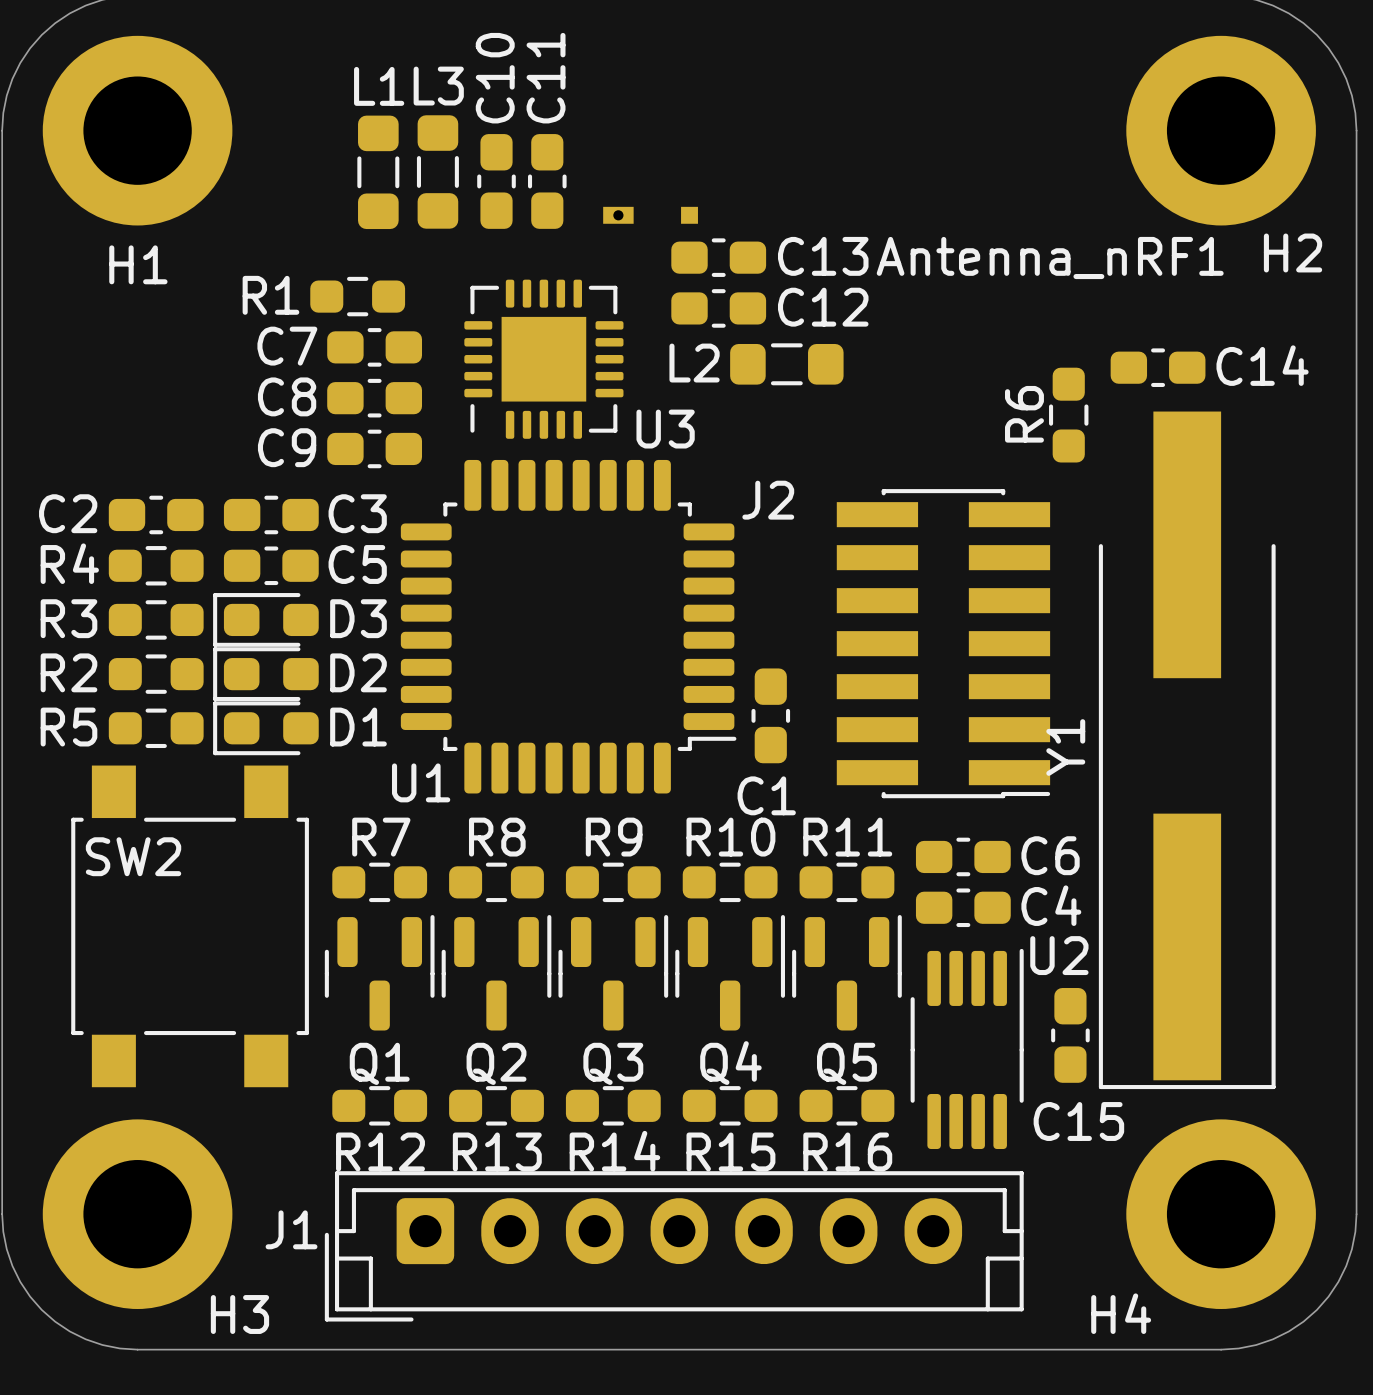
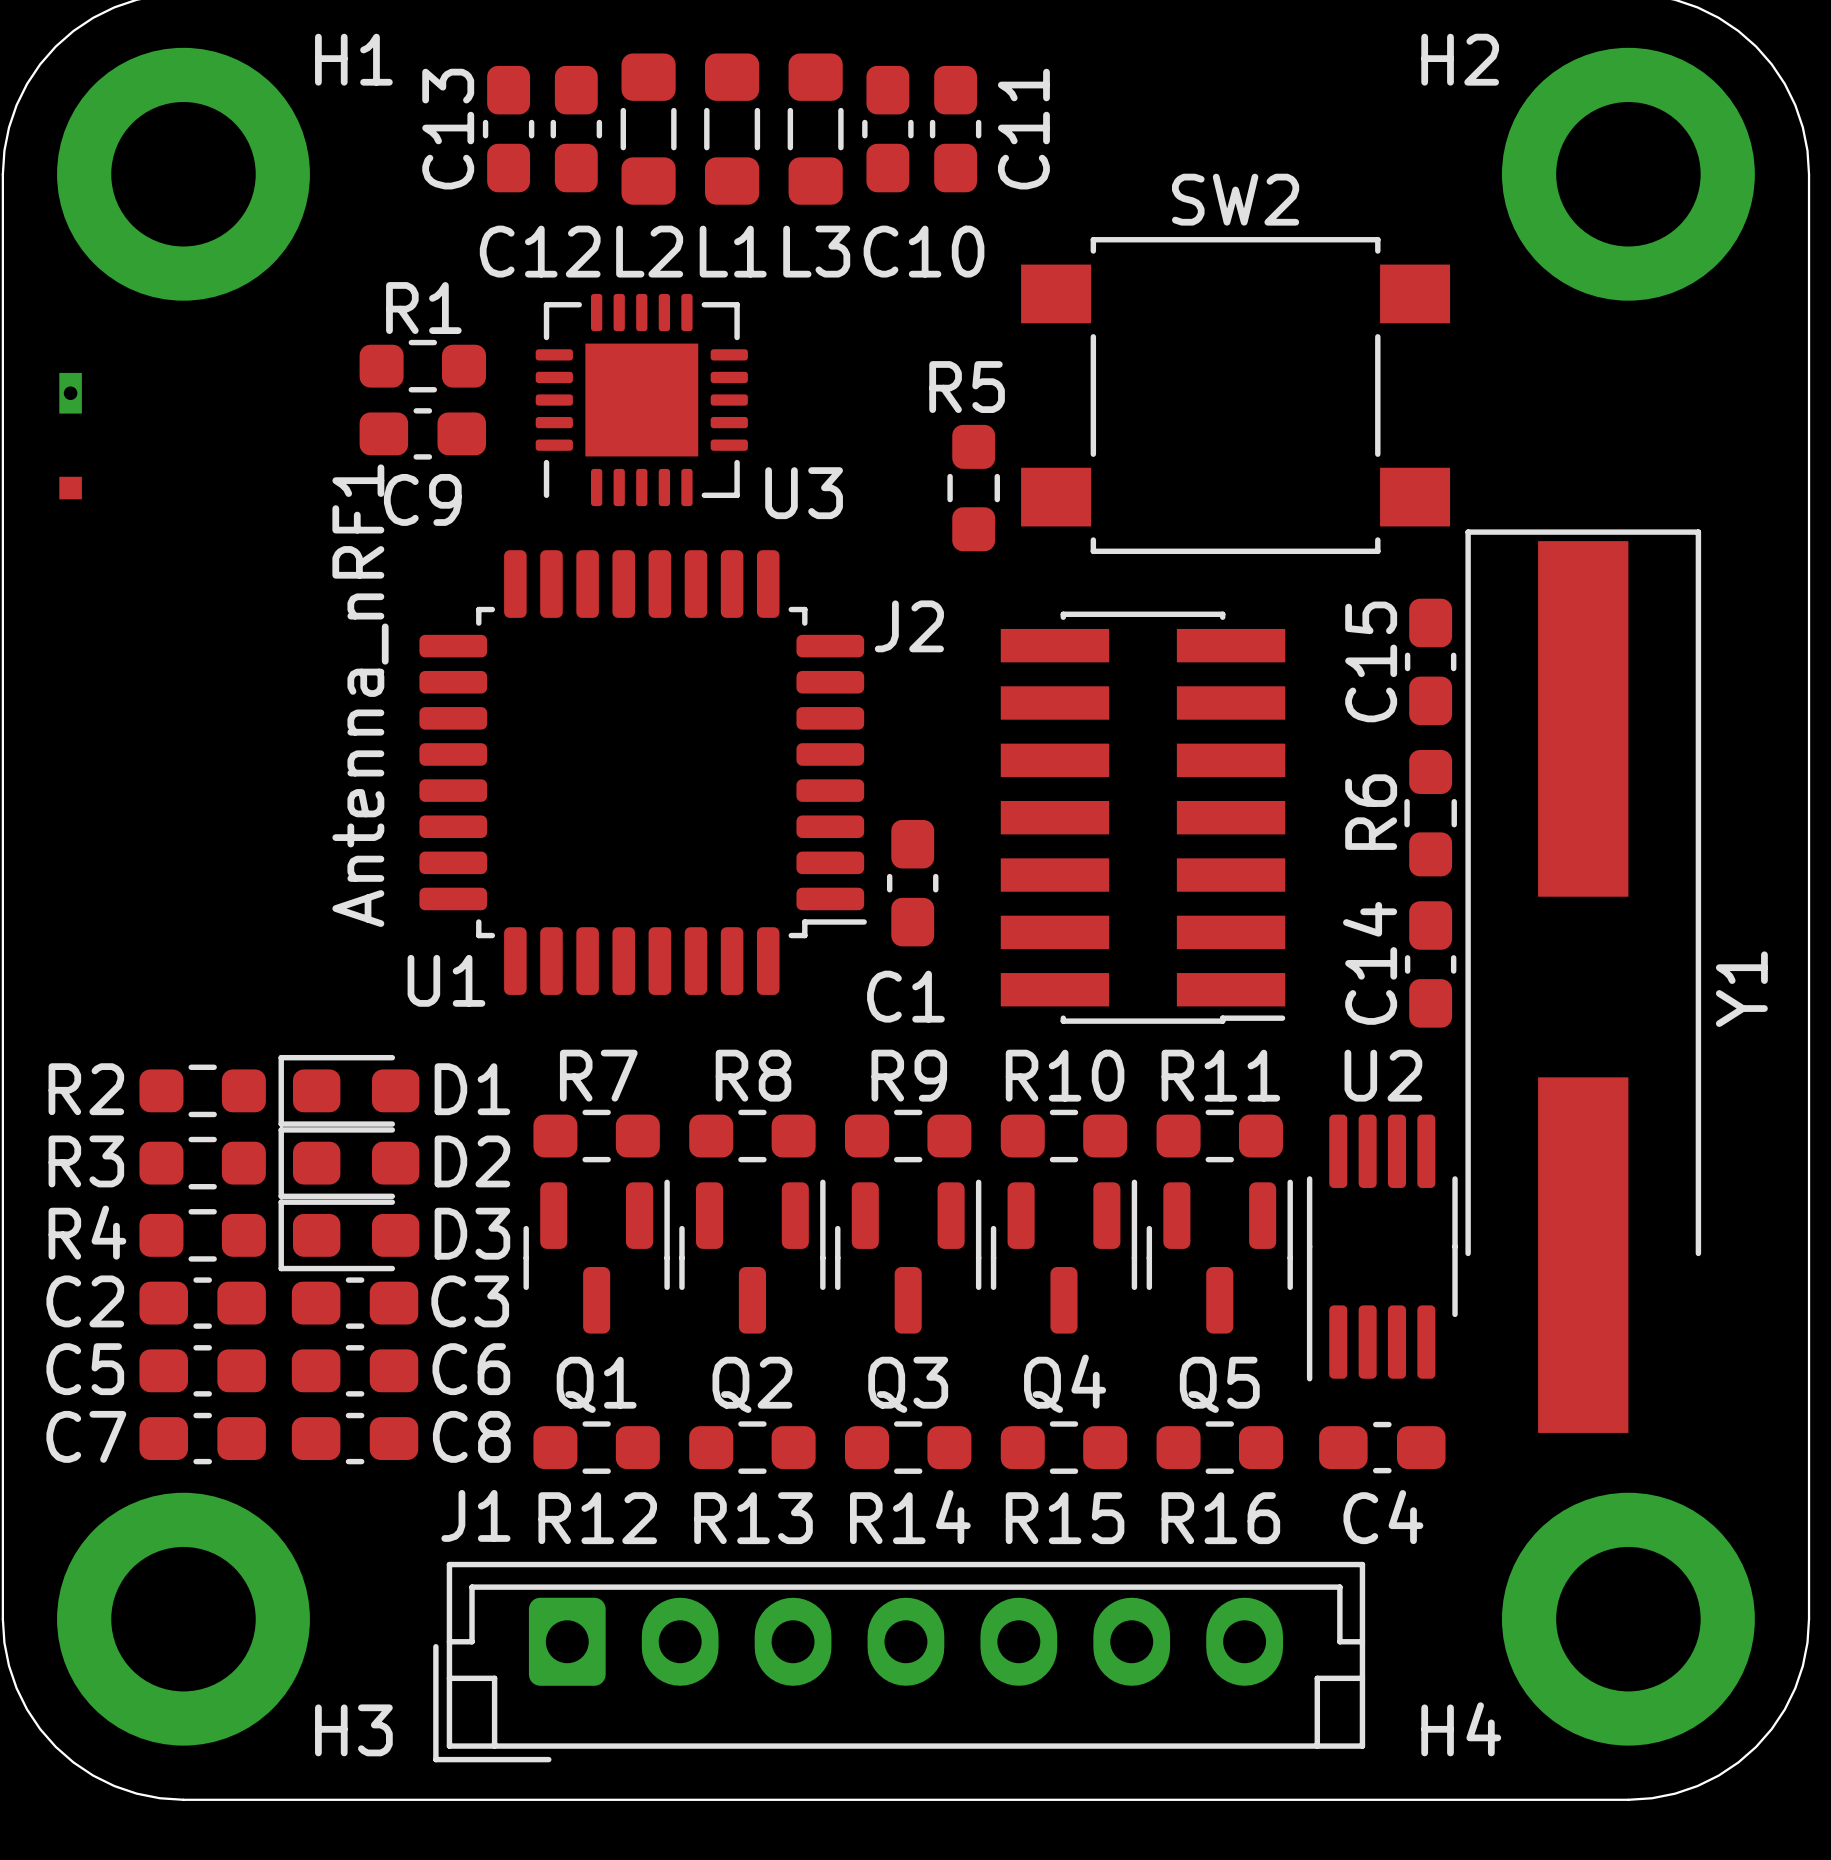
C10 name rotation: 0° (495, 78) -> 90° clockwise (924, 251)
C10 name position: C10 (495, 78) -> C10 (924, 251)
C11 name position: C11 (546, 78) -> C11 (1023, 129)
L1 name position: L1 (379, 86) -> L1 (733, 251)
L3 name position: L3 (438, 86) -> L3 (816, 251)
L3 position: (437, 171) -> (815, 129)
L1 position: (378, 172) -> (732, 129)
C10 position: (496, 181) -> (887, 129)
C11 position: (547, 181) -> (955, 129)
Antenna_nRF1 rotation: 0° (650, 215) -> 90° clockwise (70, 436)
Antenna_nRF1 position: (650, 215) -> (70, 436)
H2 name position: H2 (1293, 252) -> H2 (1460, 59)
C13 name position: C13 (823, 256) -> C13 (448, 129)
C13 rotation: 0° (718, 257) -> 90° clockwise (508, 129)
C13 position: (718, 257) -> (508, 129)
Antenna_nRF1 name position: Antenna_nRF1 (1050, 257) -> Antenna_nRF1 (360, 695)
H1 name position: H1 (138, 264) -> H1 (353, 59)
R1 name position: R1 (270, 295) -> R1 (423, 308)
R1 position: (357, 296) -> (422, 366)
C12 rotation: 0° (718, 308) -> 90° clockwise (576, 129)
C12 position: (718, 308) -> (576, 129)
C7 position: (374, 347) -> (202, 1438)
U3 position: (543, 359) -> (641, 400)
L2 name position: L2 (694, 363) -> L2 (649, 251)
L2 rotation: 0° (786, 364) -> 90° clockwise (648, 129)
L2 position: (786, 364) -> (648, 129)
C14 name position: C14 (1262, 365) -> C14 (1370, 963)
C14 rotation: 0° (1158, 367) -> 90° clockwise (1430, 964)
C14 position: (1158, 367) -> (1430, 964)
C8 name position: C8 (287, 396) -> C8 (471, 1436)
C8 position: (374, 398) -> (355, 1438)
R6 position: (1068, 415) -> (1430, 813)
C9 name position: C9 (287, 447) -> C9 (422, 499)
C9 position: (374, 448) -> (422, 433)
C2 position: (156, 514) -> (202, 1303)
C3 position: (271, 514) -> (355, 1303)
C5 name position: C5 (357, 564) -> C5 (85, 1369)
R4 position: (156, 565) -> (202, 1235)
C5 position: (271, 565) -> (202, 1370)
R3 position: (156, 619) -> (202, 1163)
D3 position: (265, 619) -> (348, 1235)
U1 position: (568, 626) -> (643, 772)
J2 position: (943, 643) -> (1143, 817)
R2 position: (156, 674) -> (202, 1090)
D2 position: (265, 674) -> (348, 1163)
C1 position: (770, 715) -> (912, 883)
R5 rotation: 0° (156, 728) -> 90° clockwise (973, 488)
R5 position: (156, 728) -> (973, 488)
D1 position: (265, 728) -> (348, 1090)
Y1 rotation: 0° (1187, 750) -> 180° (1583, 981)
C1 name position: C1 (766, 795) -> C1 (905, 996)
SW2 name position: SW2 (133, 856) -> SW2 (1235, 199)
C6 position: (963, 856) -> (355, 1370)
R7 position: (379, 882) -> (596, 1136)
R8 position: (496, 882) -> (752, 1136)
R9 position: (613, 882) -> (908, 1136)
R10 position: (730, 882) -> (1063, 1136)
R11 position: (846, 882) -> (1219, 1136)
C4 name position: C4 (1051, 905) -> C4 (1383, 1517)
C4 position: (963, 907) -> (1382, 1447)
SW2 rotation: 0° (190, 926) -> 90° clockwise (1235, 395)
SW2 position: (190, 926) -> (1235, 395)
U2 name position: U2 (1059, 955) -> U2 (1383, 1075)
Q1 position: (379, 972) -> (596, 1256)
Q2 position: (496, 972) -> (752, 1256)
Q3 position: (613, 972) -> (908, 1256)
Q4 position: (730, 972) -> (1063, 1256)
Q5 position: (846, 972) -> (1219, 1256)
C15 position: (1070, 1035) -> (1430, 661)
U2 rotation: 0° (967, 1048) -> 180° (1382, 1248)
U2 position: (967, 1048) -> (1382, 1248)
Q1 name position: Q1 (379, 1063) -> Q1 (596, 1384)
Q2 name position: Q2 (496, 1063) -> Q2 (752, 1384)
Q3 name position: Q3 (613, 1063) -> Q3 (908, 1384)
Q4 name position: Q4 (730, 1063) -> Q4 (1065, 1383)
Q5 name position: Q5 (846, 1063) -> Q5 (1219, 1384)
R12 position: (379, 1105) -> (596, 1447)
R13 position: (496, 1105) -> (752, 1447)
R14 position: (613, 1105) -> (908, 1447)
R15 position: (730, 1105) -> (1063, 1447)
R16 position: (846, 1105) -> (1219, 1447)
C15 name rotation: 0° (1078, 1121) -> 90° counterclockwise (1371, 661)
R12 name position: R12 (380, 1151) -> R12 (597, 1518)
R13 name position: R13 (497, 1151) -> R13 (753, 1518)
R14 name position: R14 (614, 1151) -> R14 (910, 1517)
R15 name position: R15 (730, 1151) -> R15 (1065, 1518)
R16 name position: R16 (847, 1151) -> R16 (1220, 1518)
J1 name position: J1 (291, 1229) -> J1 (475, 1515)
H4 name position: H4 (1121, 1313) -> H4 (1461, 1729)
H3 name position: H3 (239, 1314) -> H3 (353, 1730)

